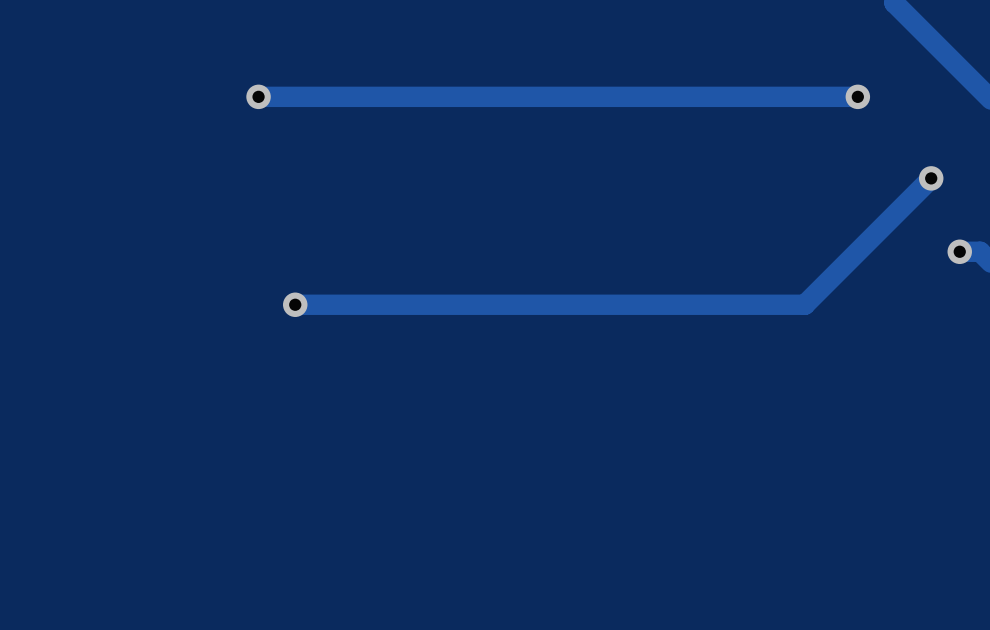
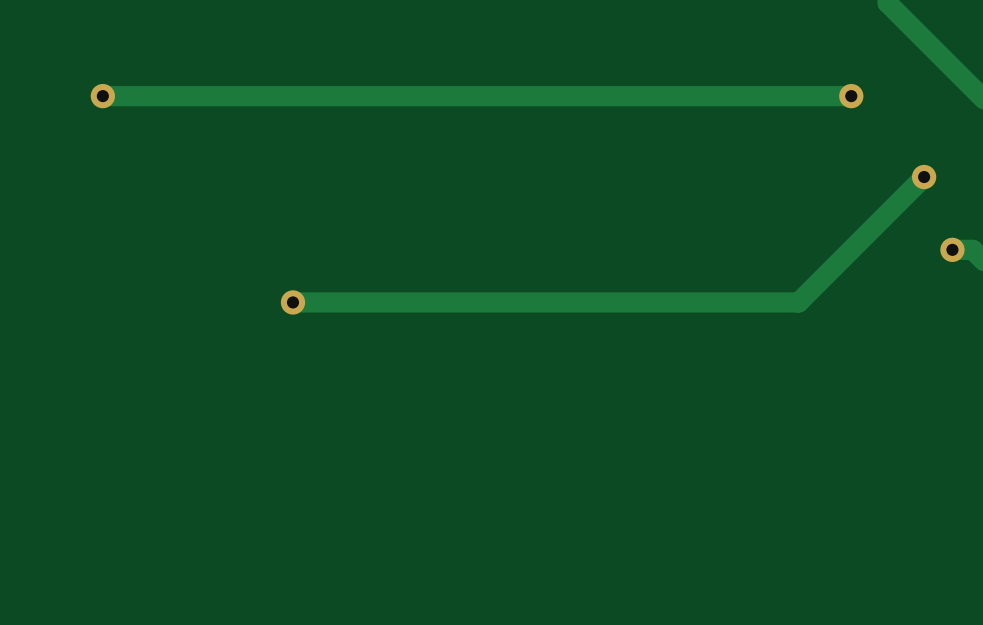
track: none -> (102, 96) (256, 96)
via position: (258, 96) -> (102, 96)

